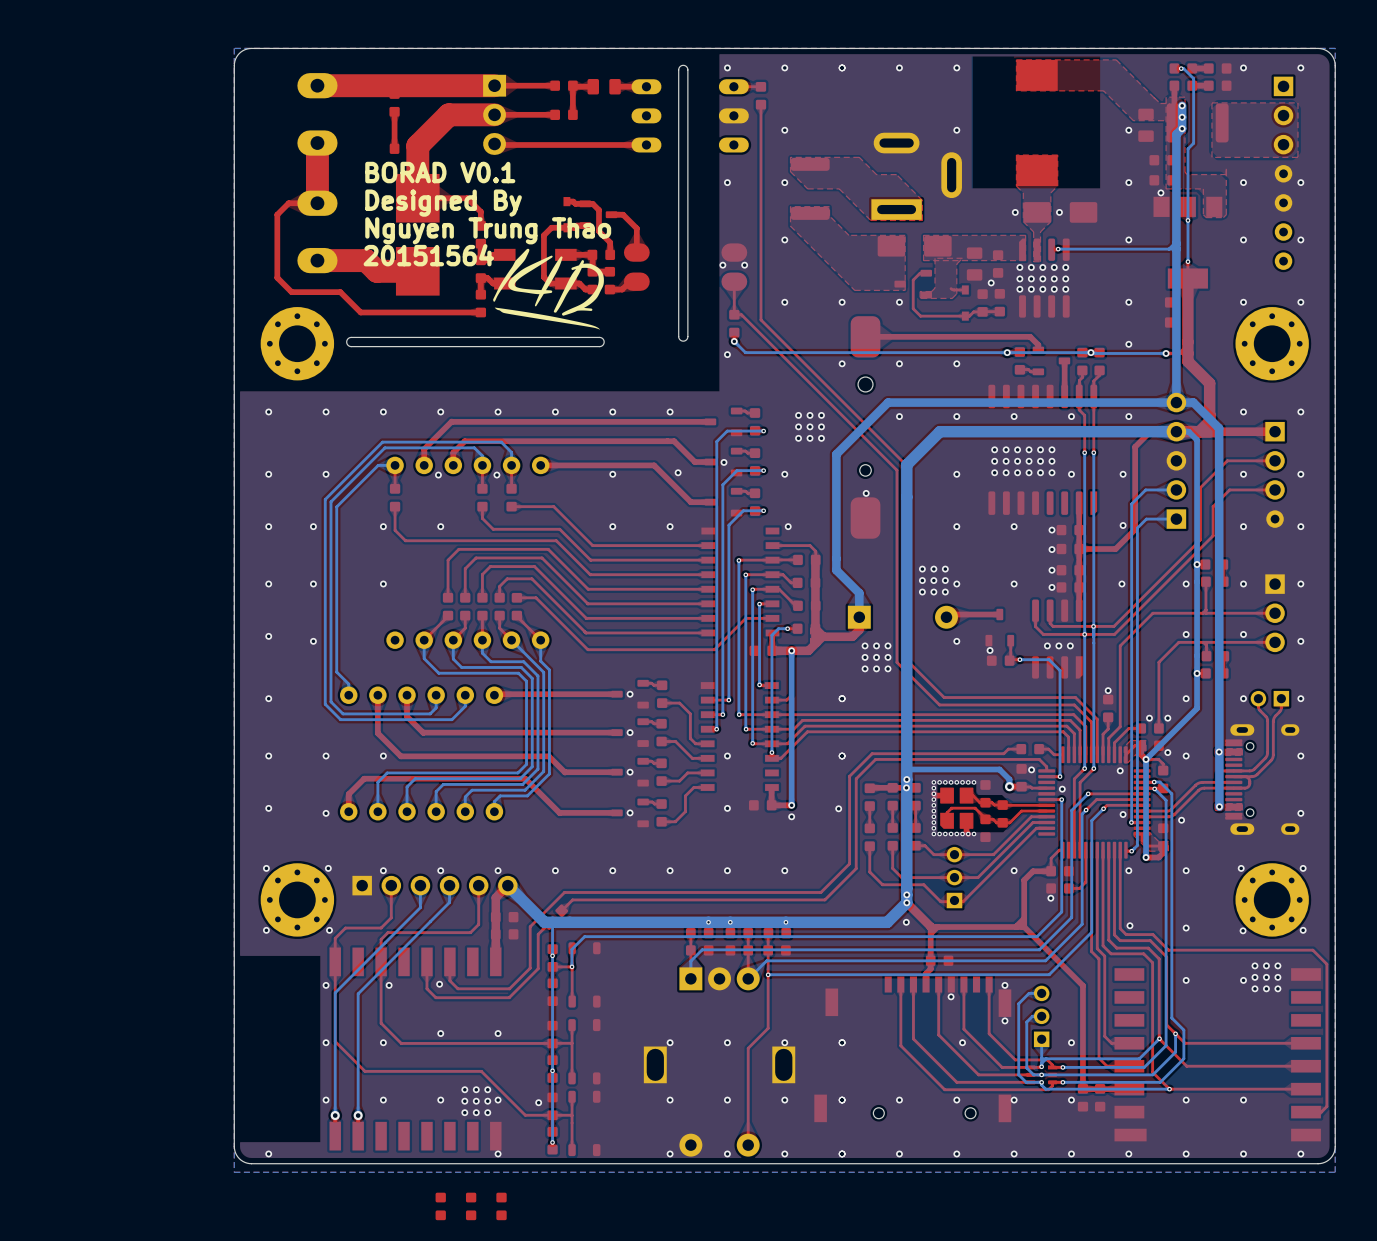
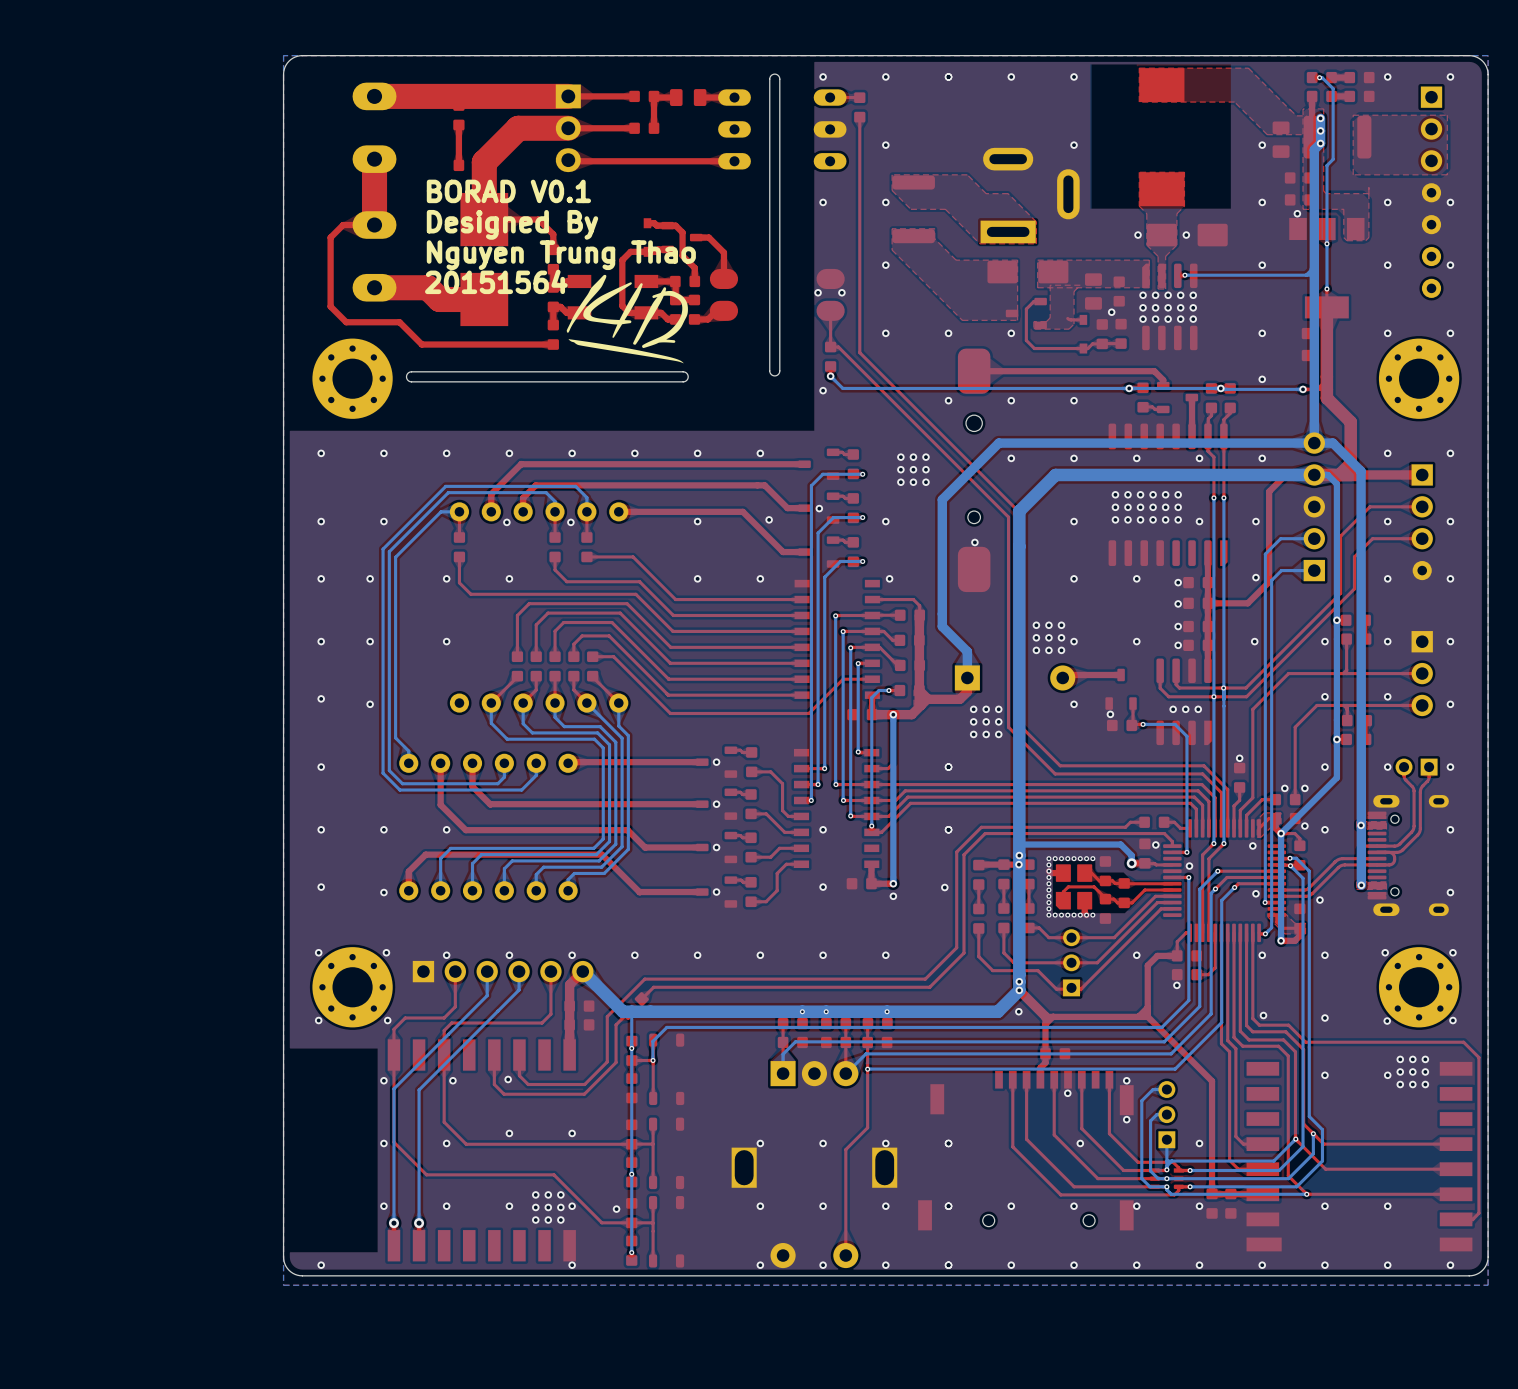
part: (440, 1206) -> none
part: (471, 1206) -> none
part: (501, 1206) -> none

